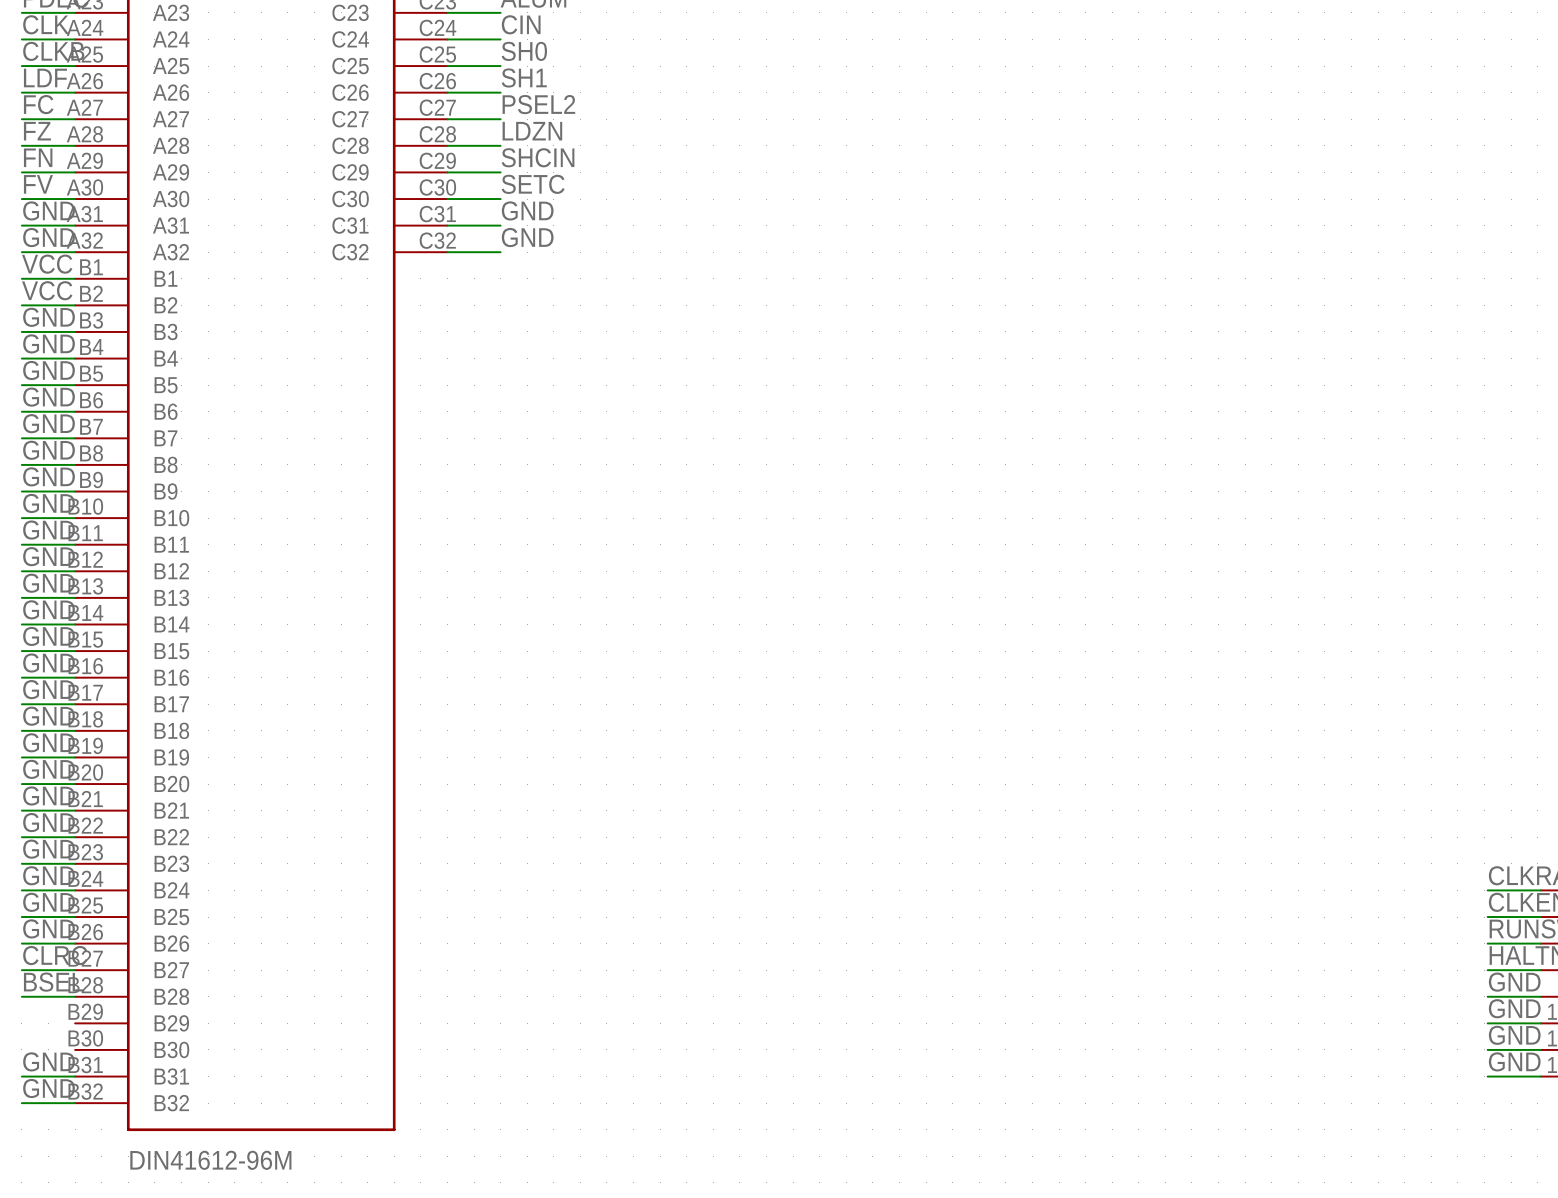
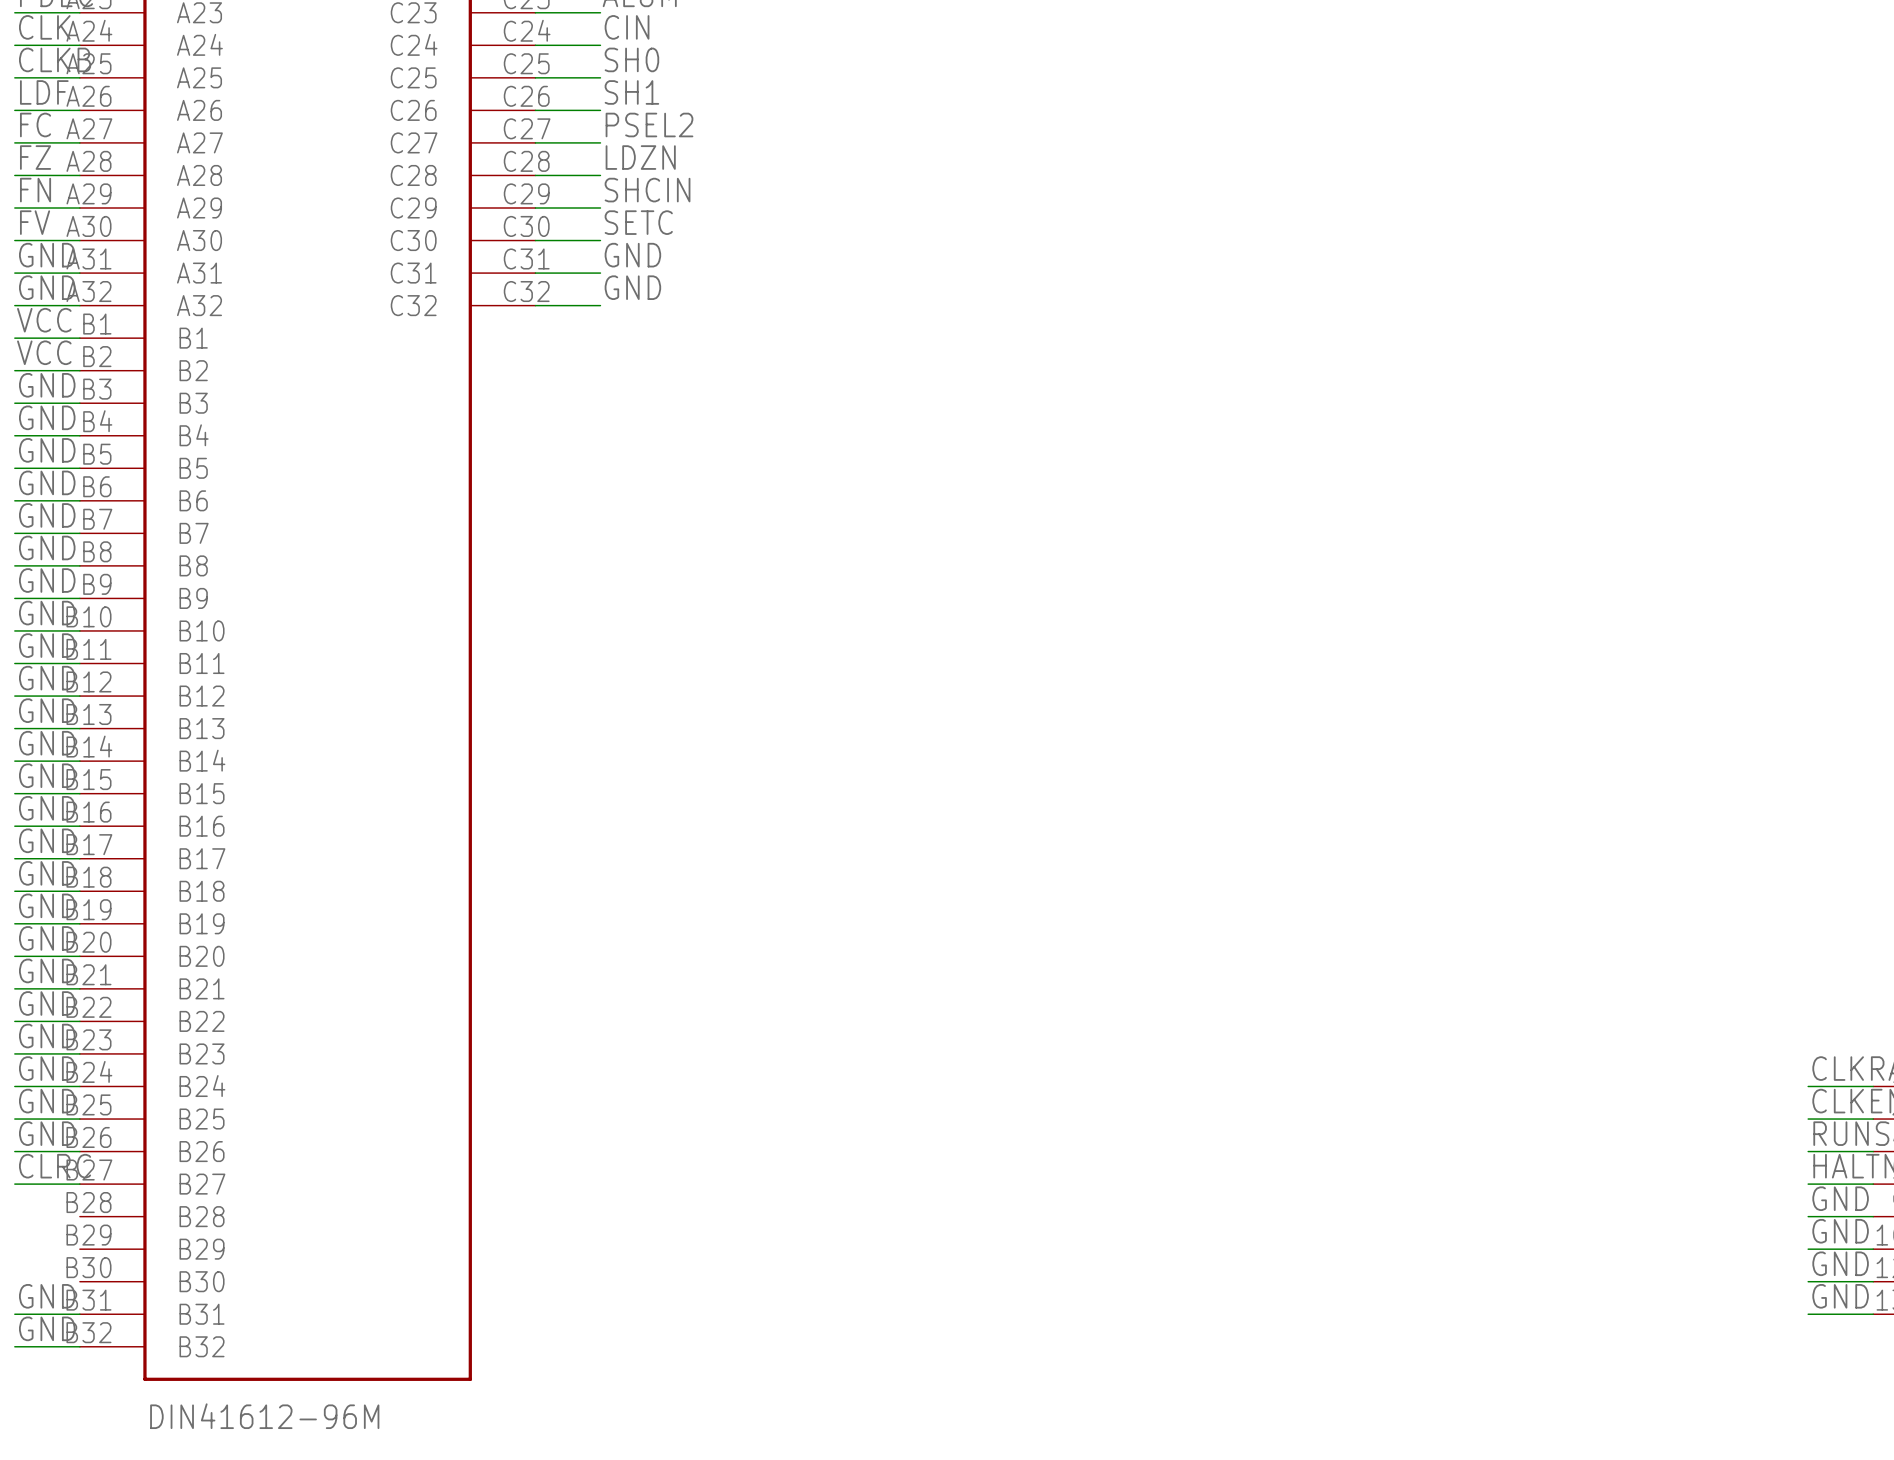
label: BSEL (53, 982) -> none
wire: (21, 996) (75, 996) -> none

